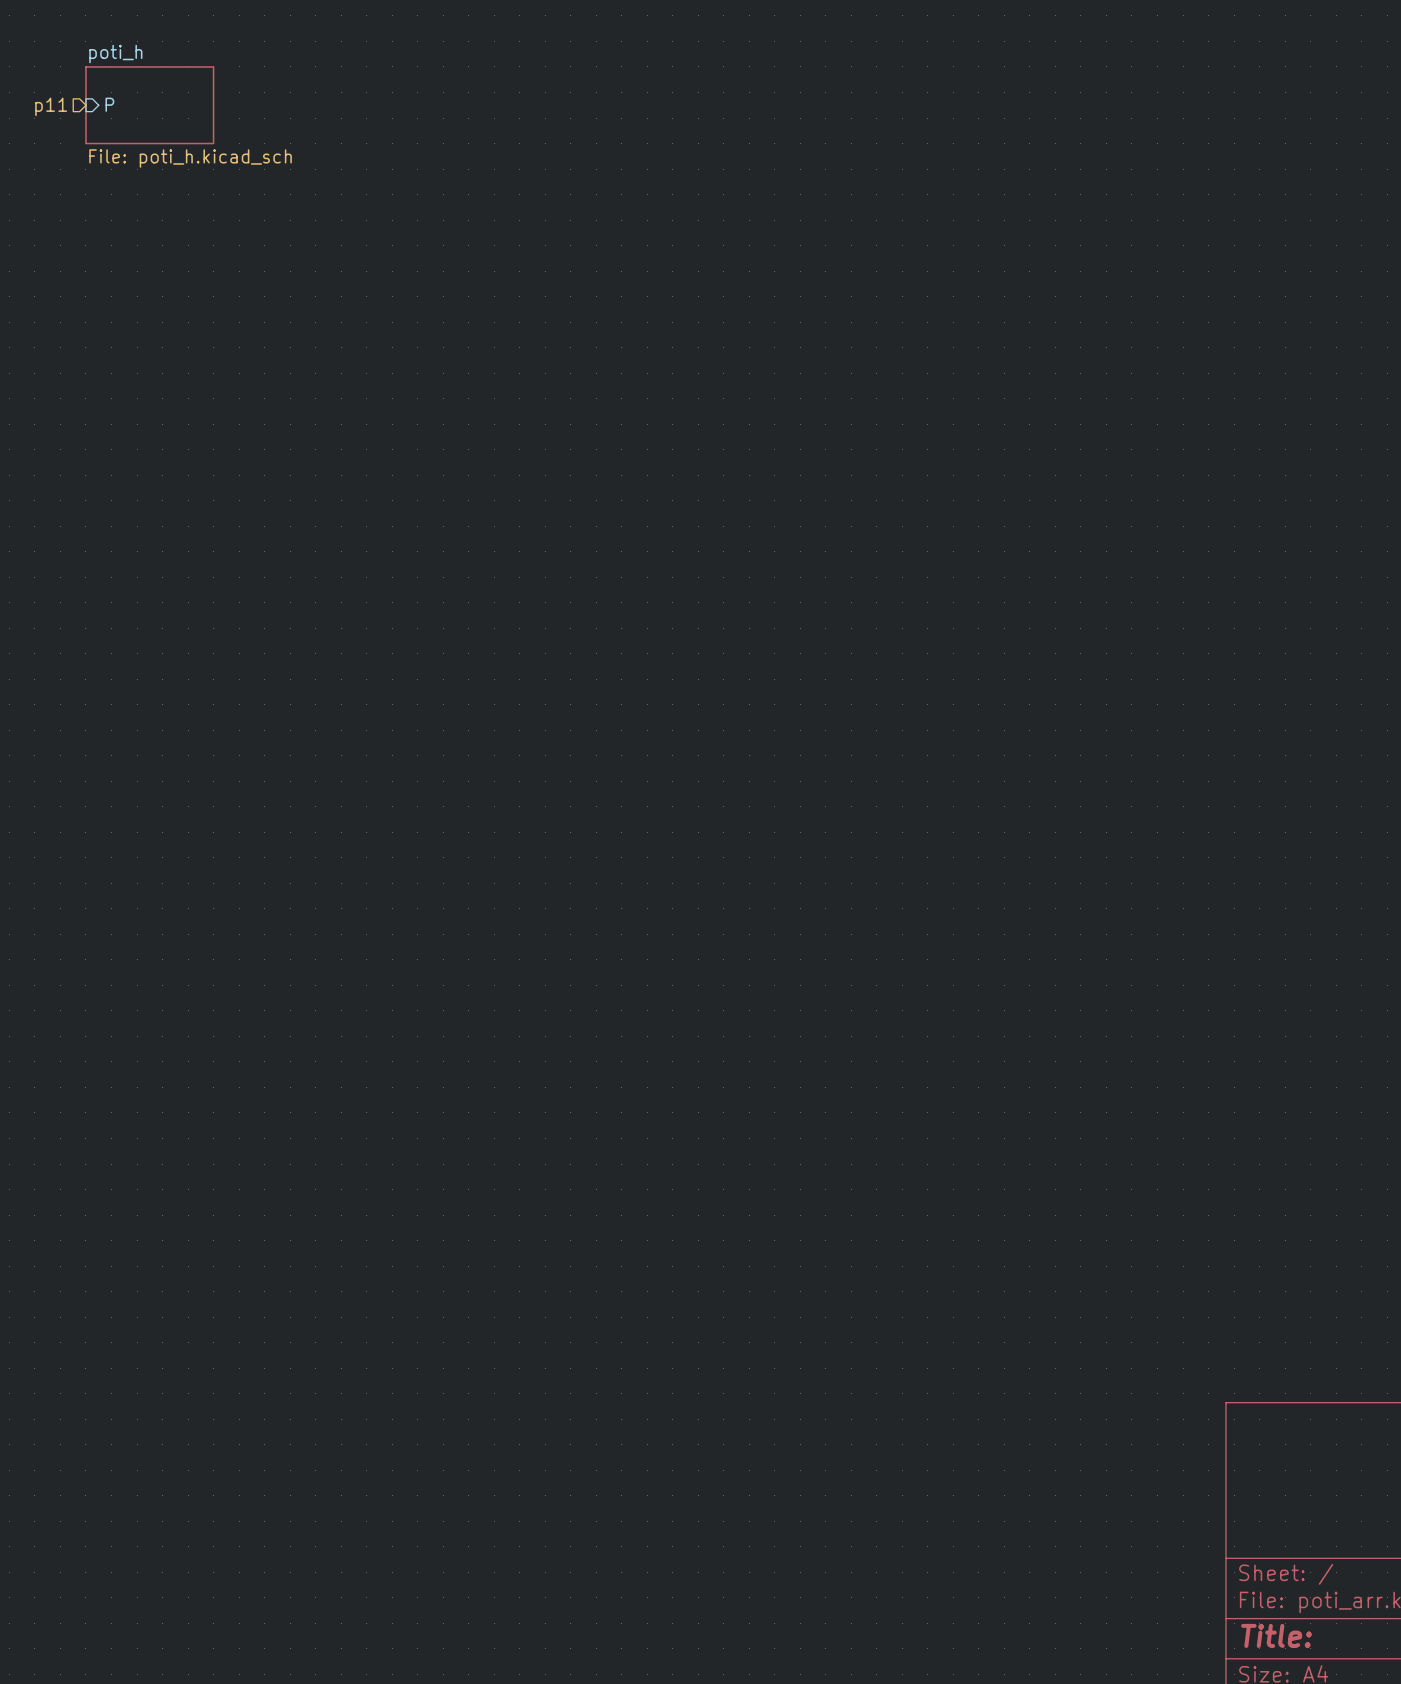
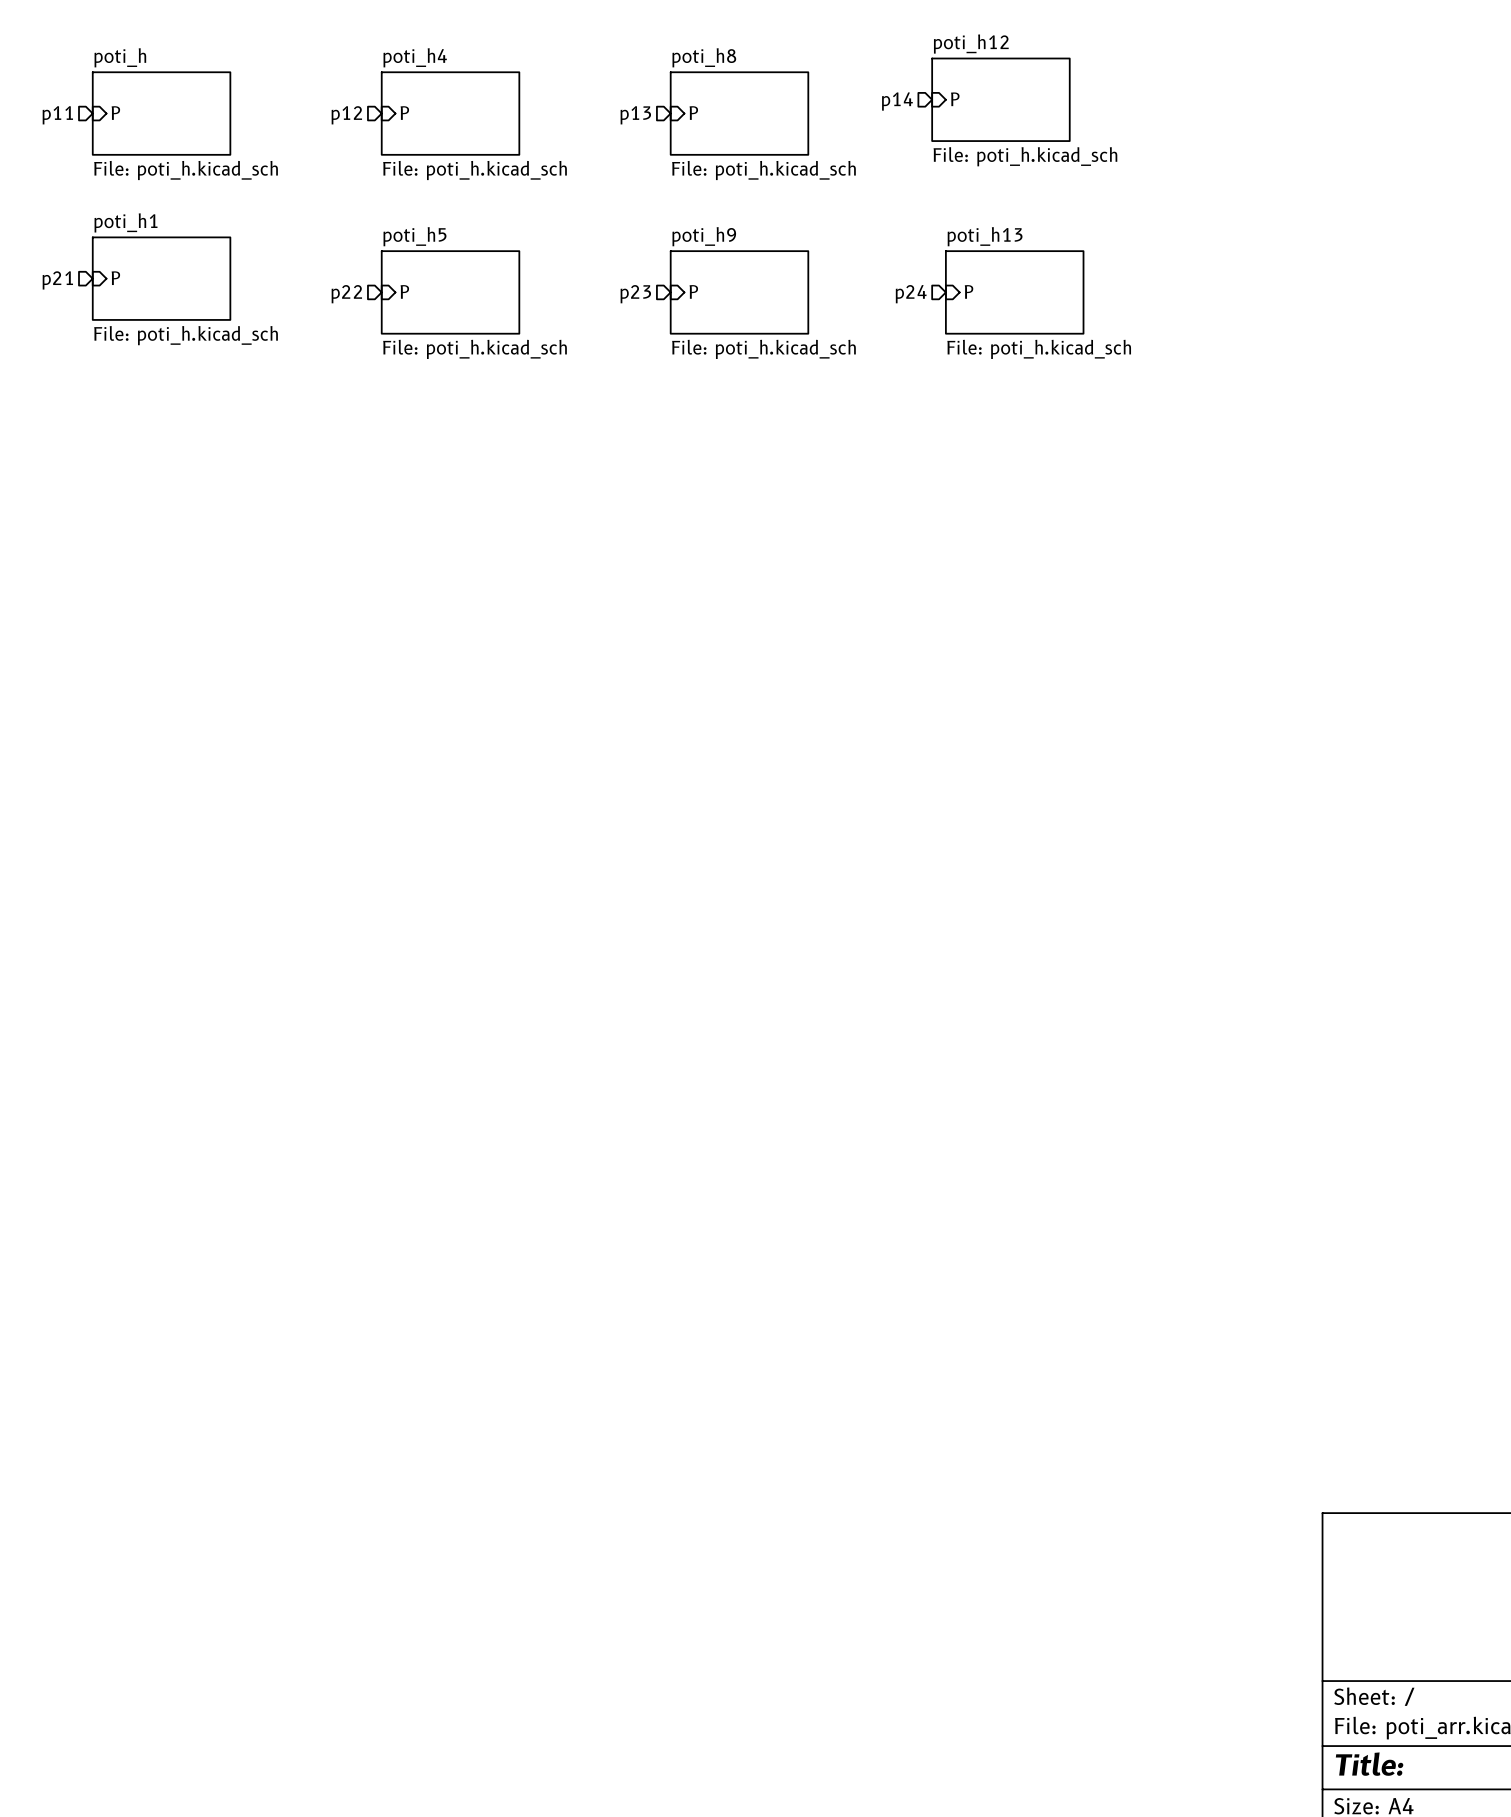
sheet pin: none -> P (955, 99)
sheet poti_h12: none -> File: poti_h.kicad_sch (1000, 99)
hierarchical label: none -> p14 (897, 101)
sheet pin: none -> P (404, 113)
sheet pin: none -> P (693, 113)
sheet poti_h4: none -> File: poti_h.kicad_sch (450, 113)
sheet poti_h8: none -> File: poti_h.kicad_sch (739, 113)
hierarchical label: none -> p12 (346, 115)
hierarchical label: none -> p13 (635, 115)
sheet pin: none -> P (115, 278)
sheet poti_h1: none -> File: poti_h.kicad_sch (161, 278)
hierarchical label: none -> p21 (57, 280)
sheet pin: none -> P (404, 291)
sheet pin: none -> P (693, 291)
sheet pin: none -> P (969, 291)
sheet poti_h5: none -> File: poti_h.kicad_sch (450, 292)
sheet poti_h9: none -> File: poti_h.kicad_sch (739, 292)
sheet poti_h13: none -> File: poti_h.kicad_sch (1014, 292)
hierarchical label: none -> p22 (346, 294)
hierarchical label: none -> p23 (635, 294)
hierarchical label: none -> p24 (911, 294)

